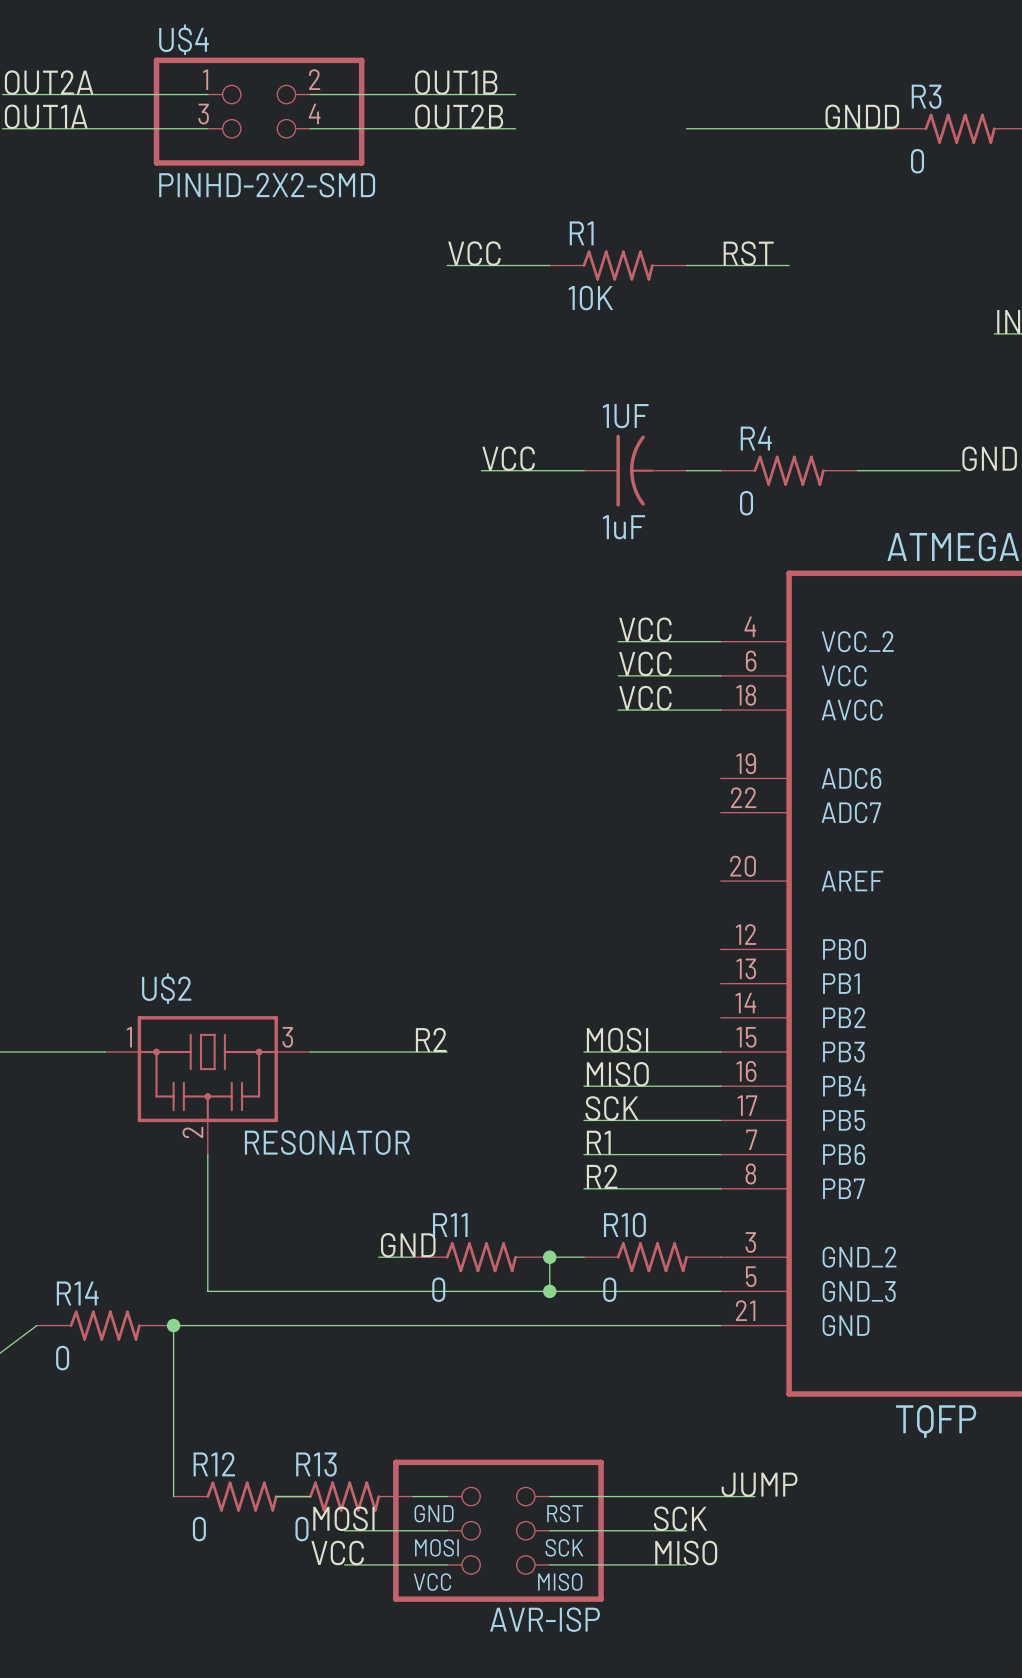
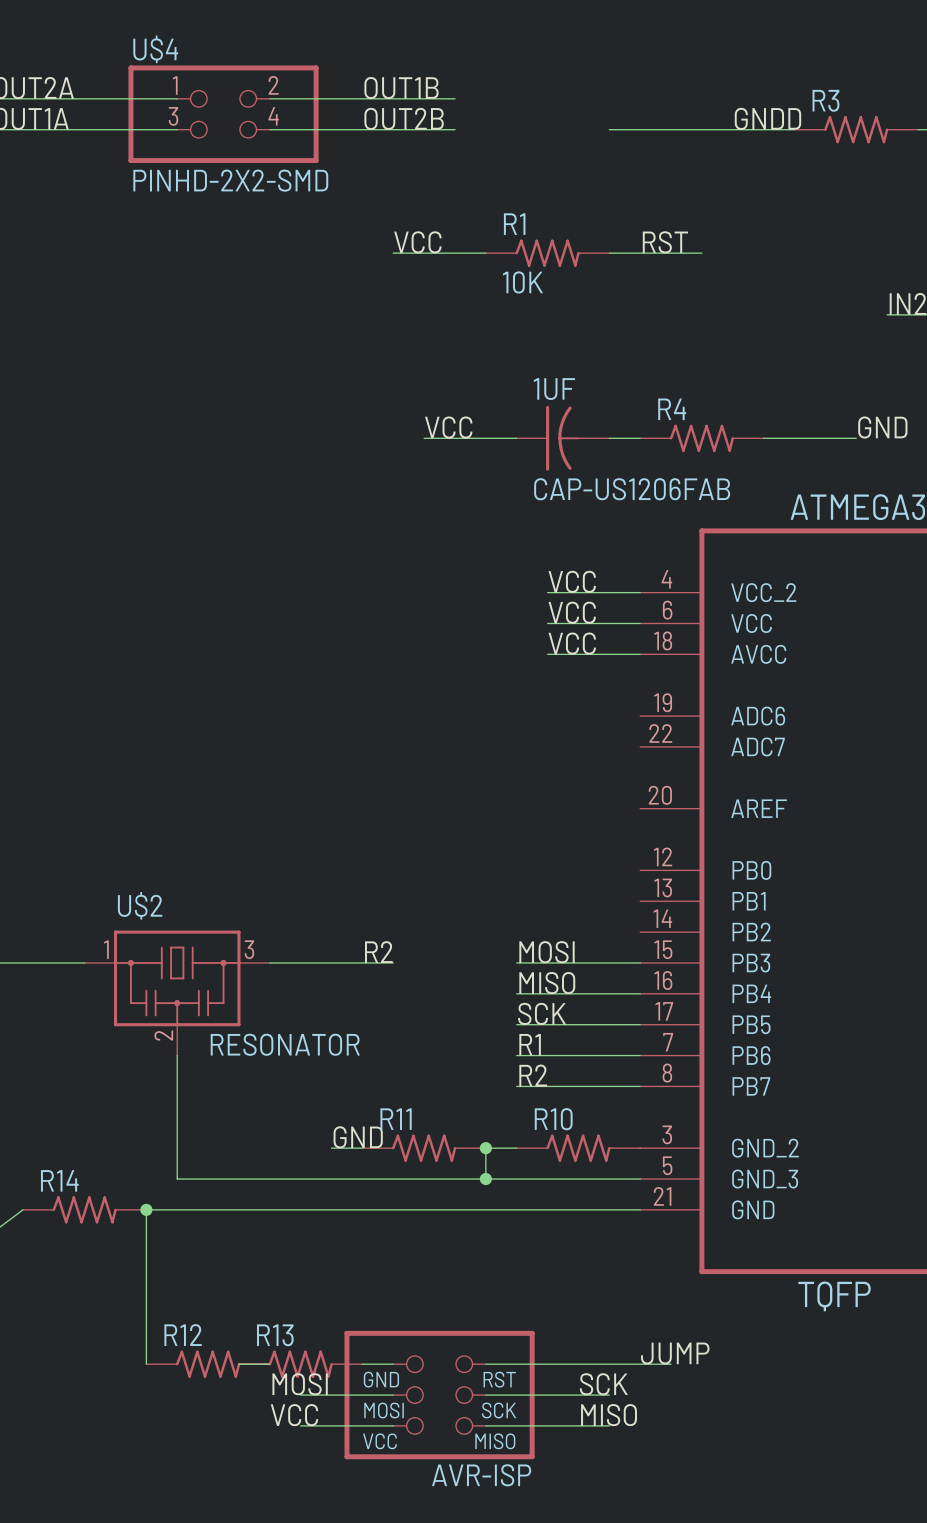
R3 value: 0 (917, 161) -> none
R4 value: 0 (746, 503) -> none
1UF value: 1uF (623, 527) -> CAP-US1206FAB (632, 489)
R11 value: 0 (438, 1289) -> none
R10 value: 0 (609, 1289) -> none
R14 value: 0 (62, 1358) -> none
R12 value: 0 (199, 1529) -> none
R13 value: 0 (301, 1529) -> none

